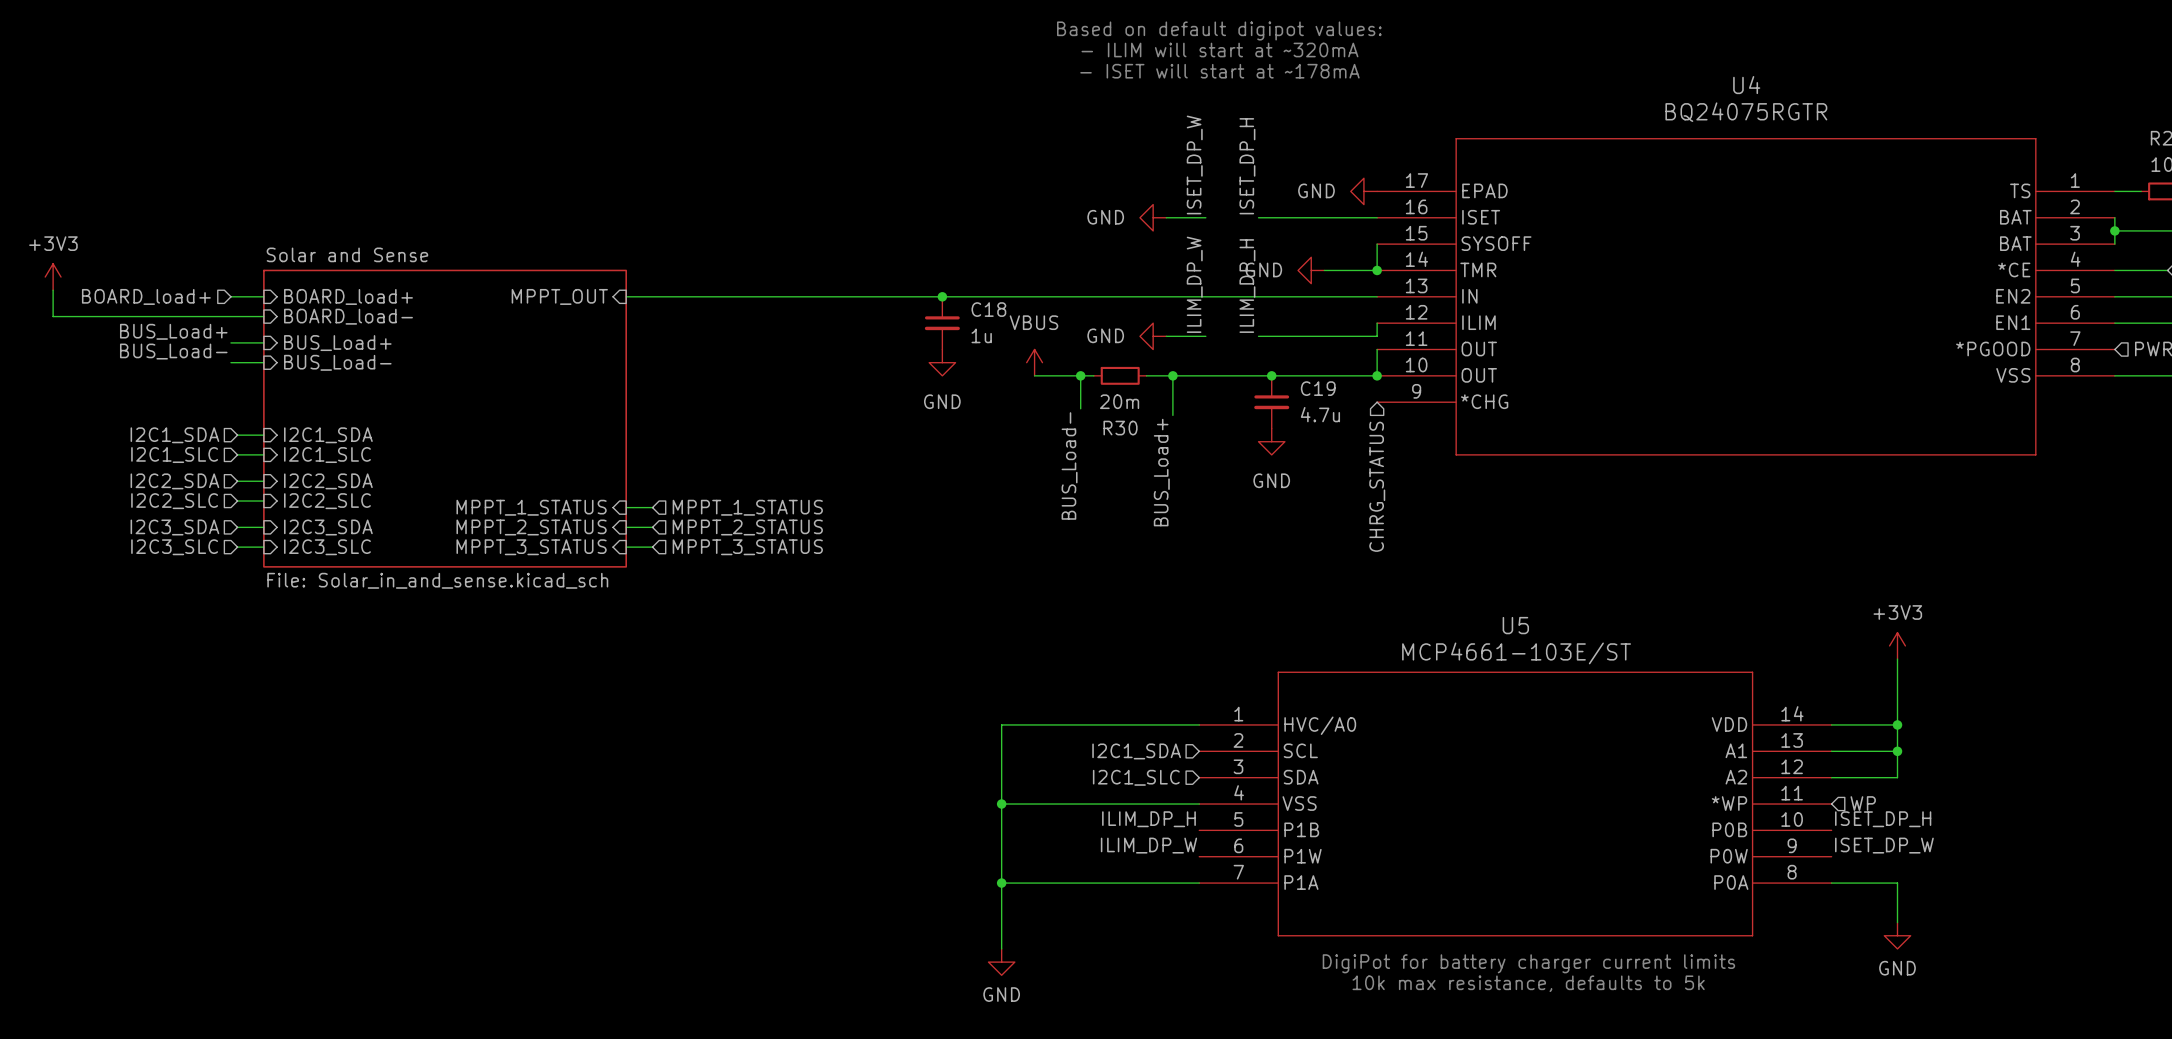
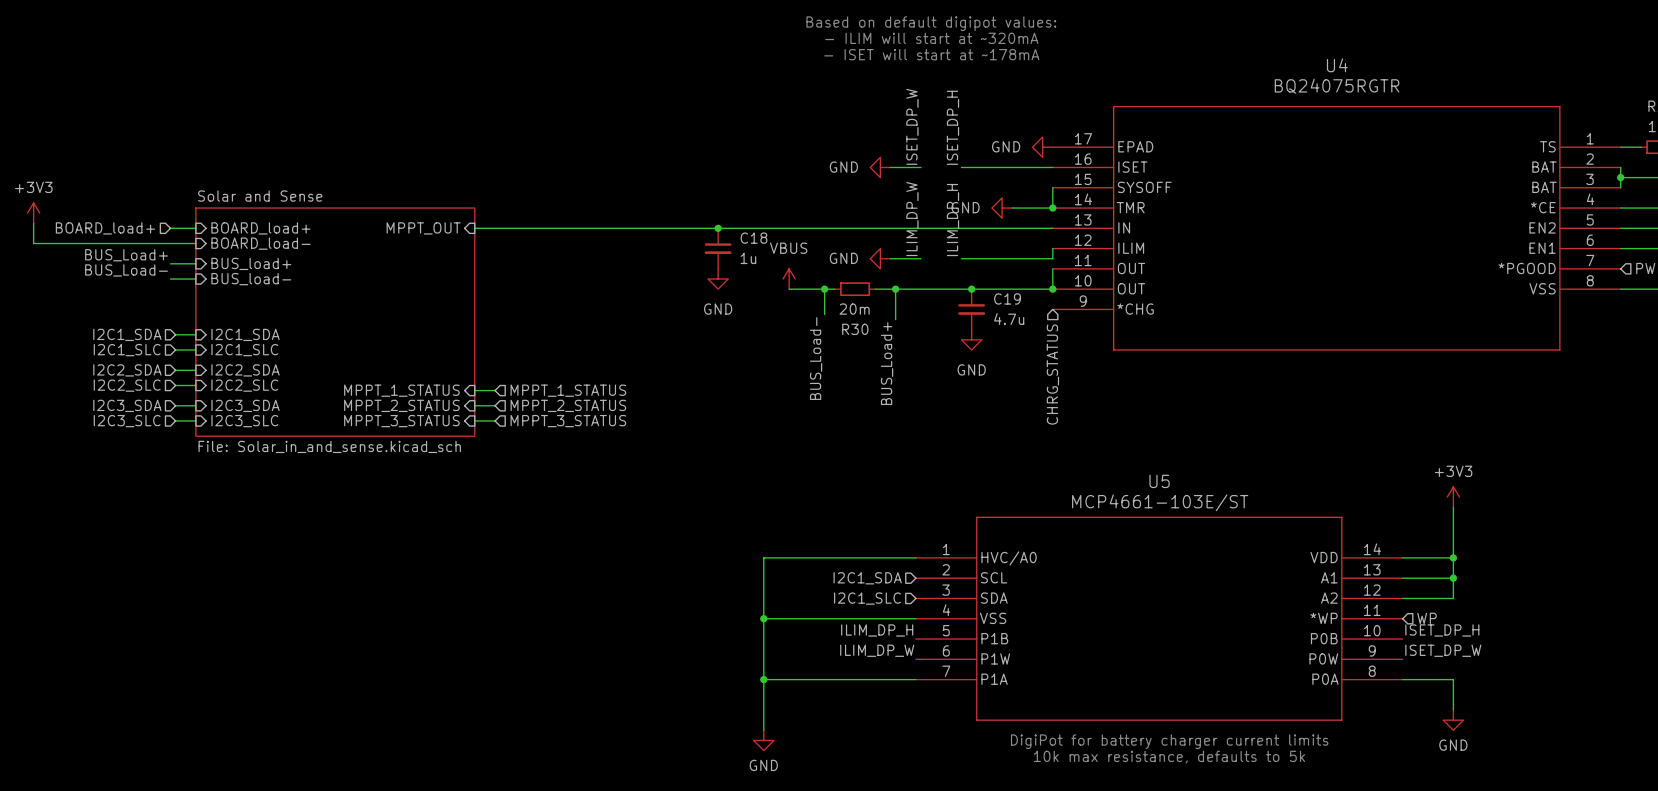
sheet pin: BUS_Load+ (337, 343) -> BUS_load+ (251, 263)
sheet pin: BUS_Load- (337, 362) -> BUS_load- (251, 279)

